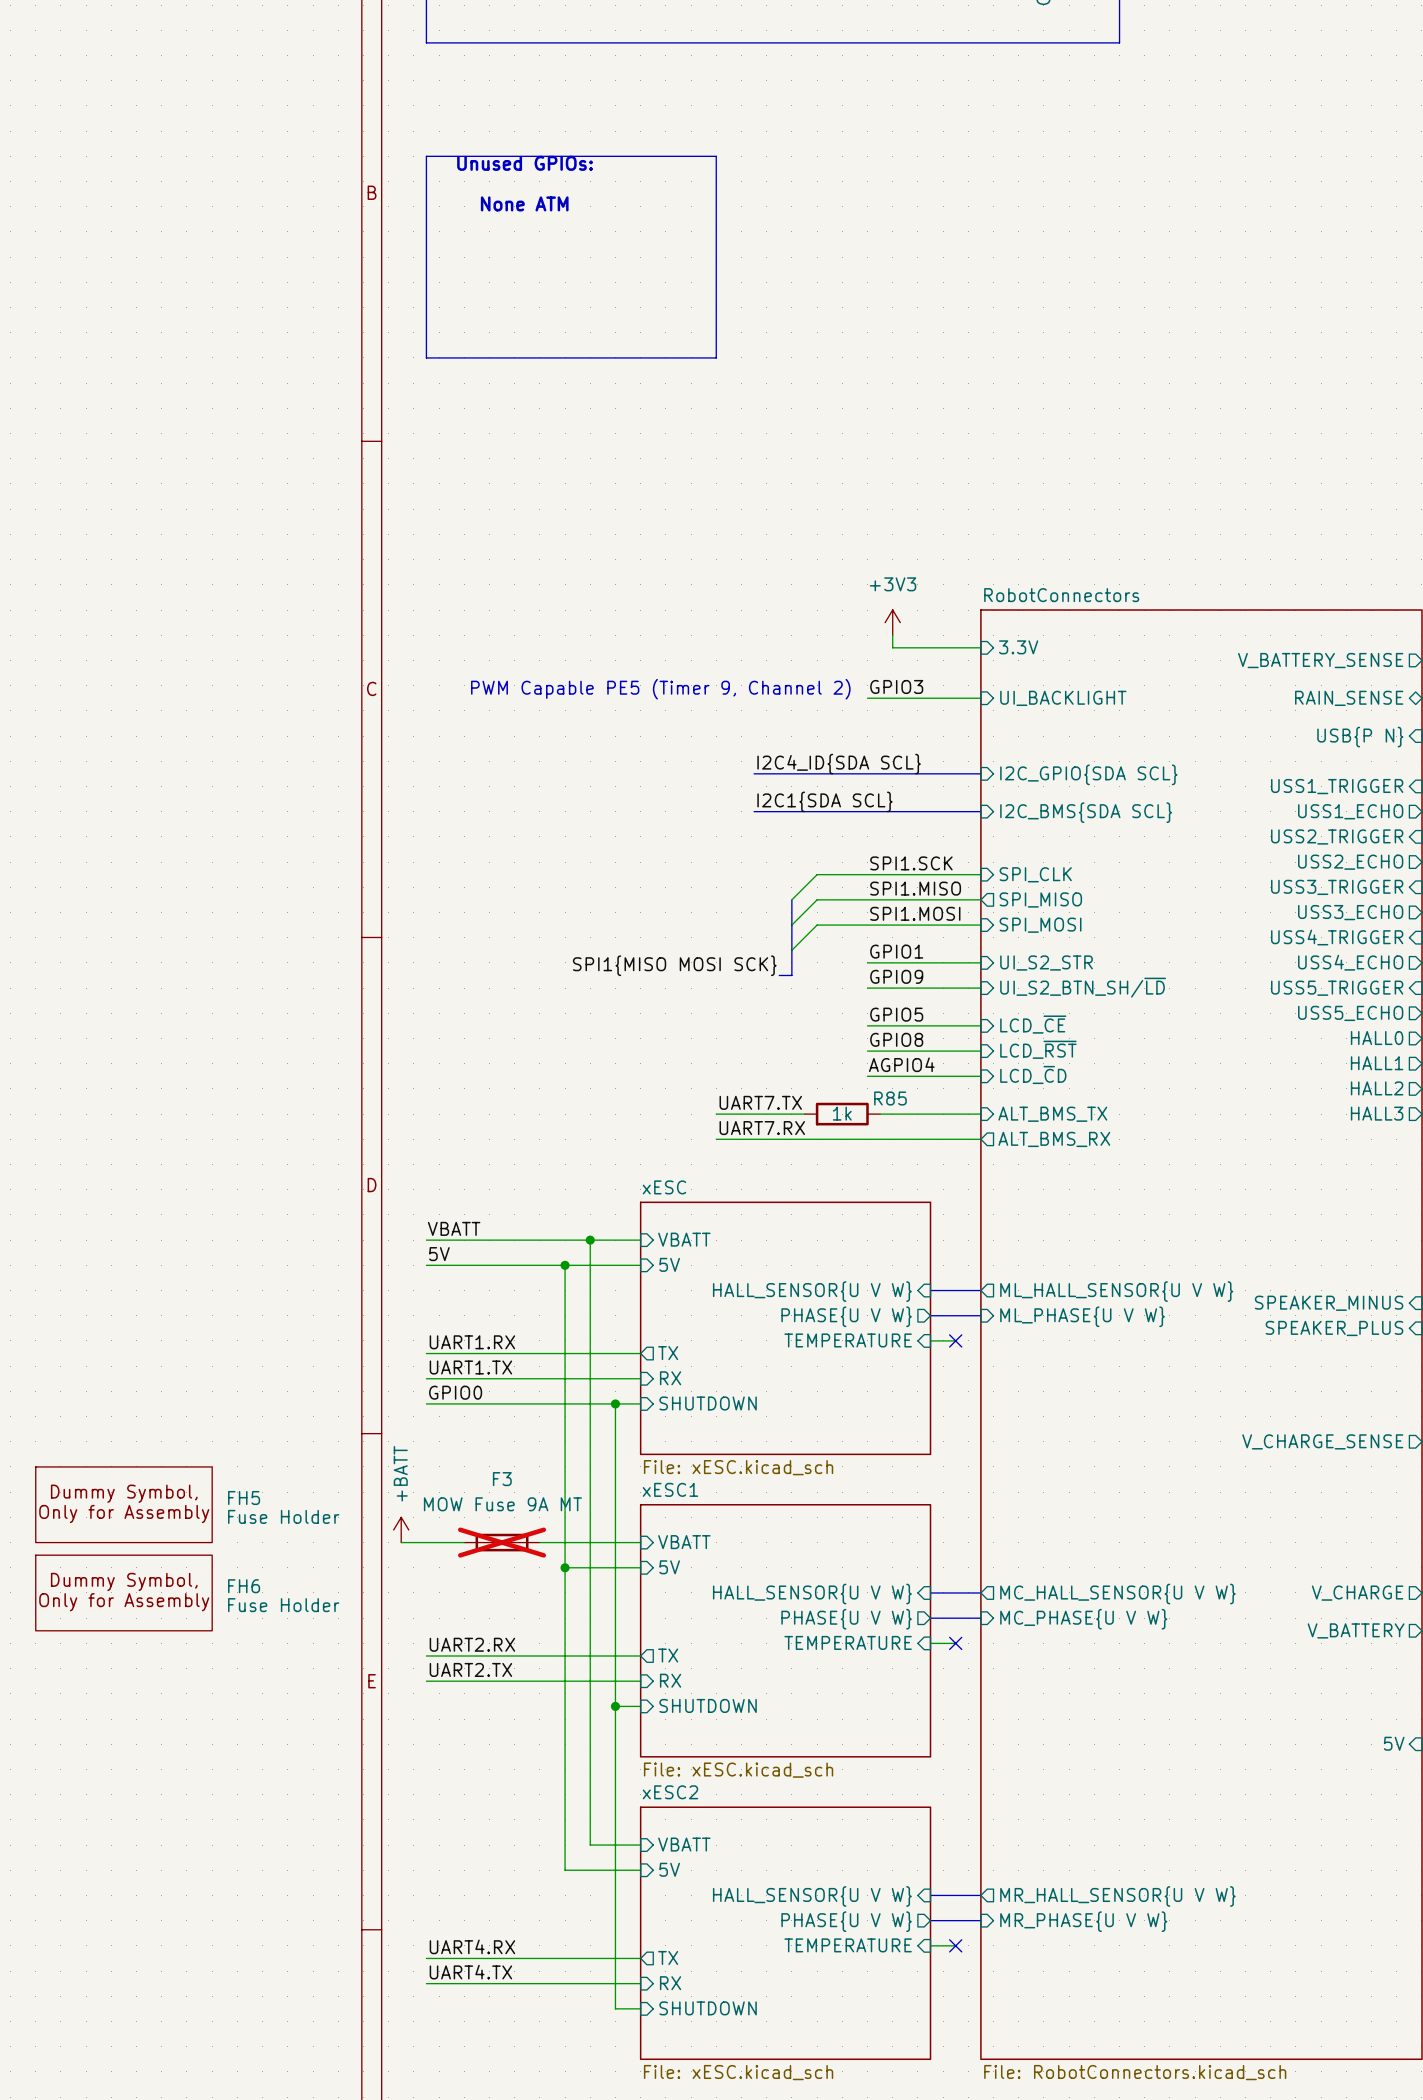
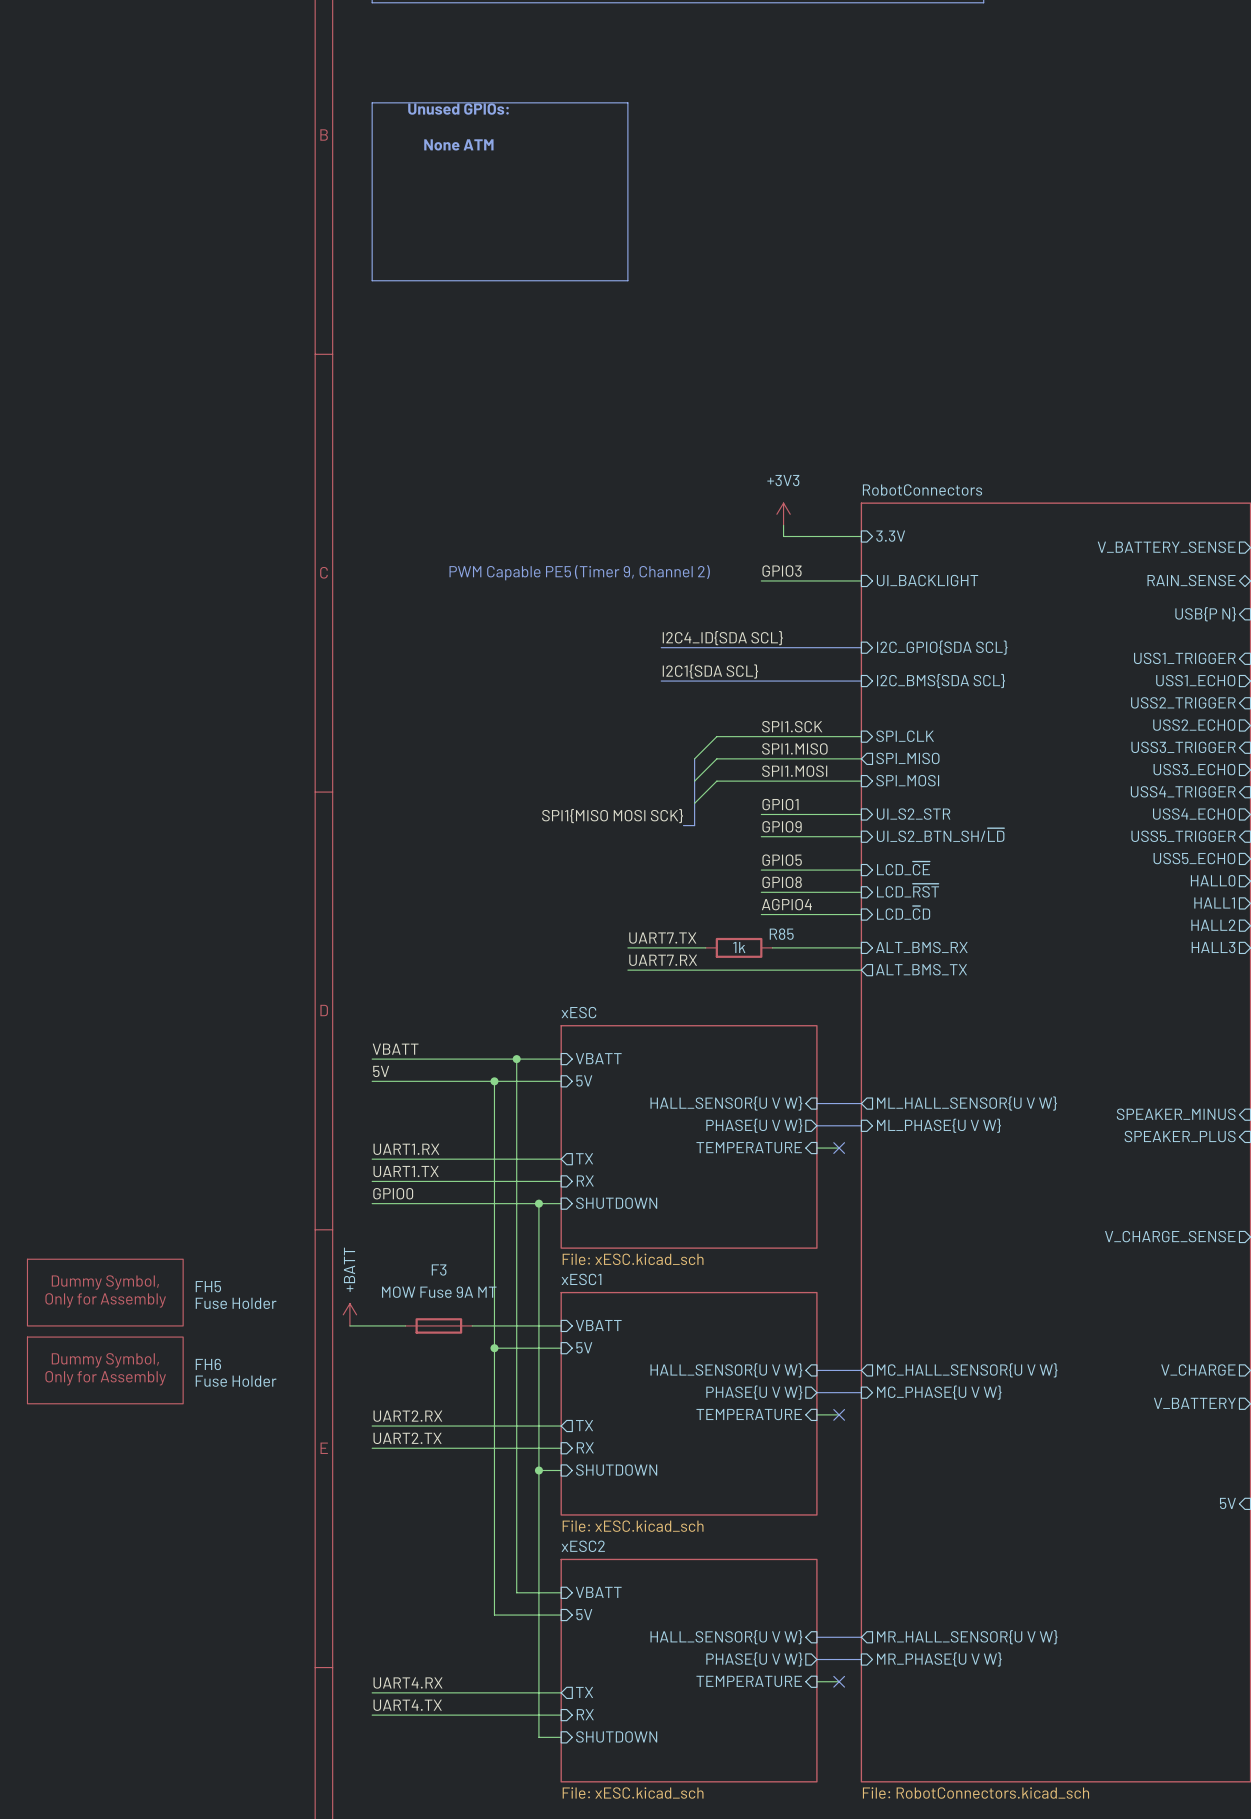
sheet pin: ALT_BMS_TX (1052, 1114) -> ALT_BMS_RX (921, 947)
sheet pin: ALT_BMS_RX (1054, 1139) -> ALT_BMS_TX (921, 969)
F3 do-not-place cross: (502, 1542) -> none

